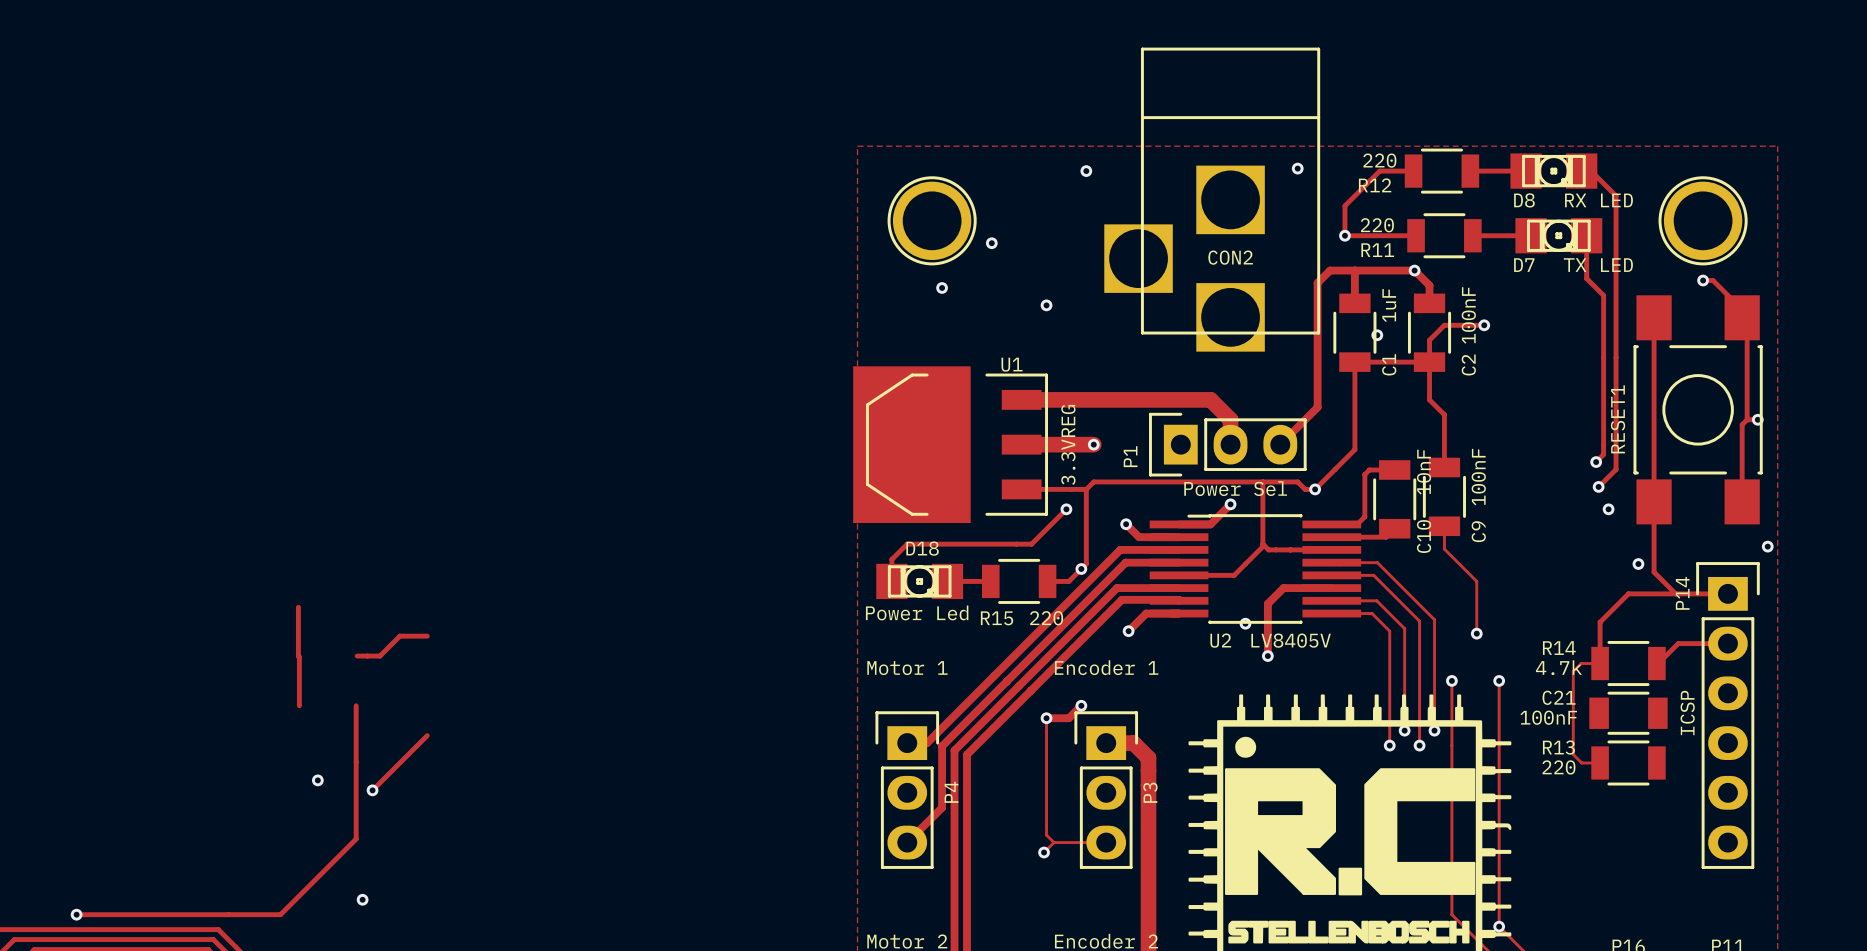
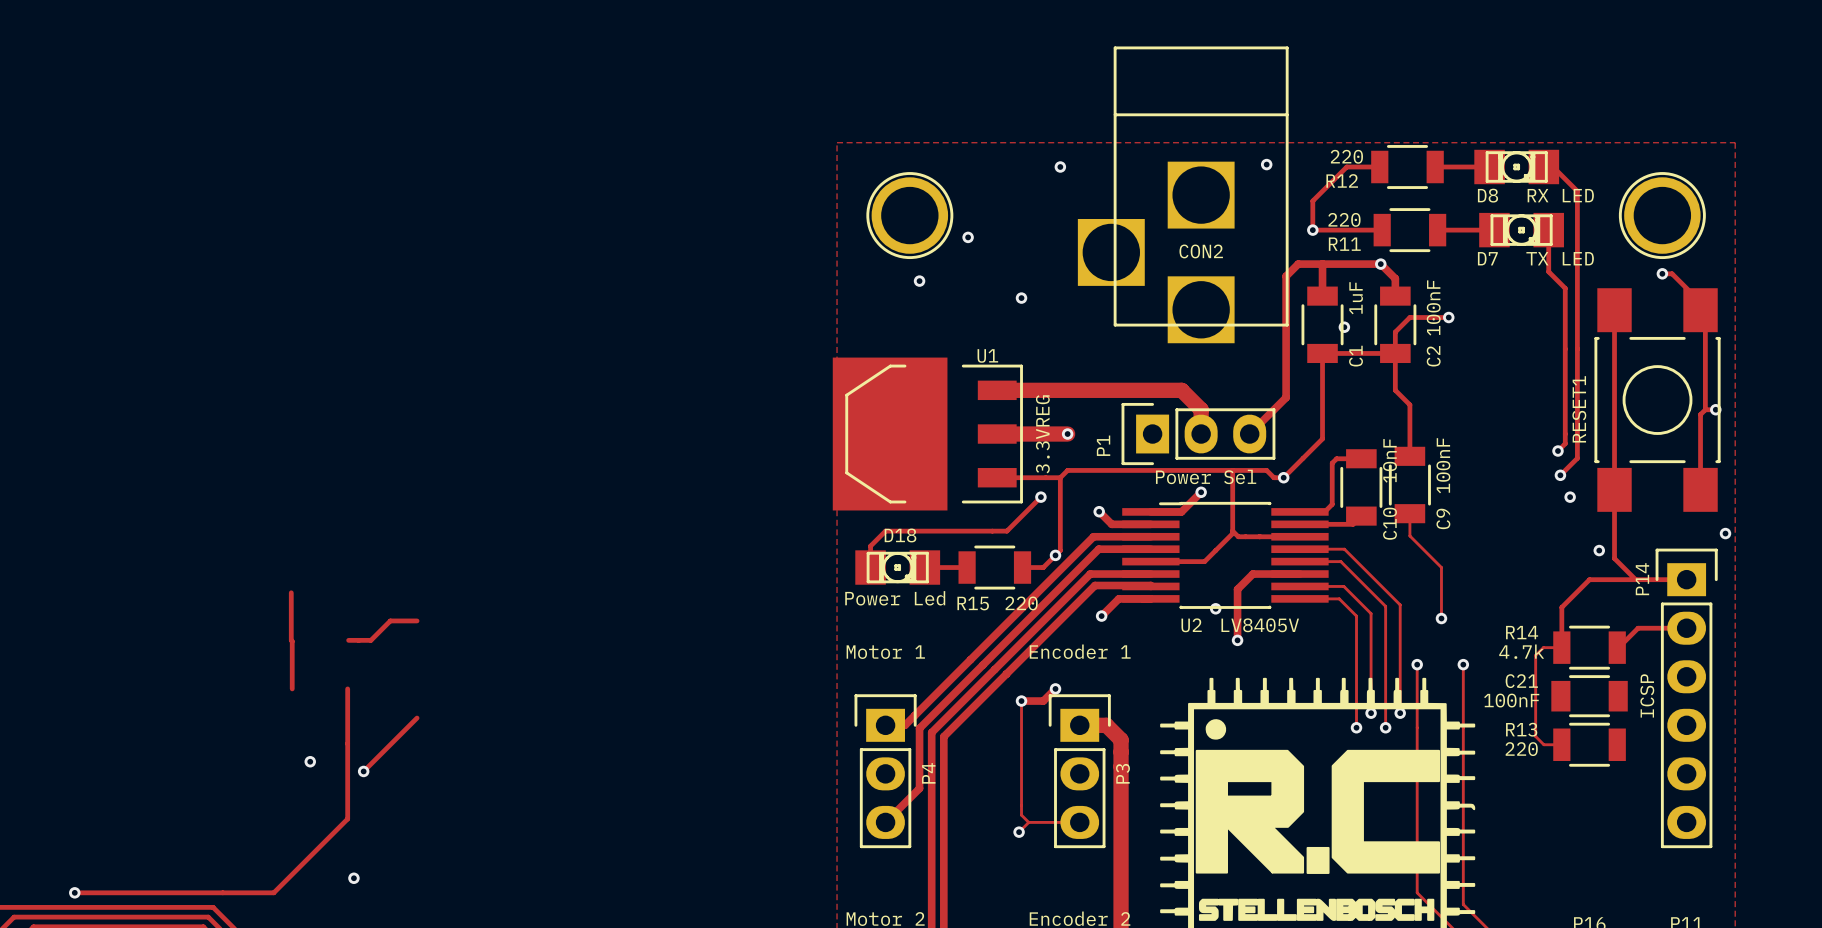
via: (1499, 926) -> none

